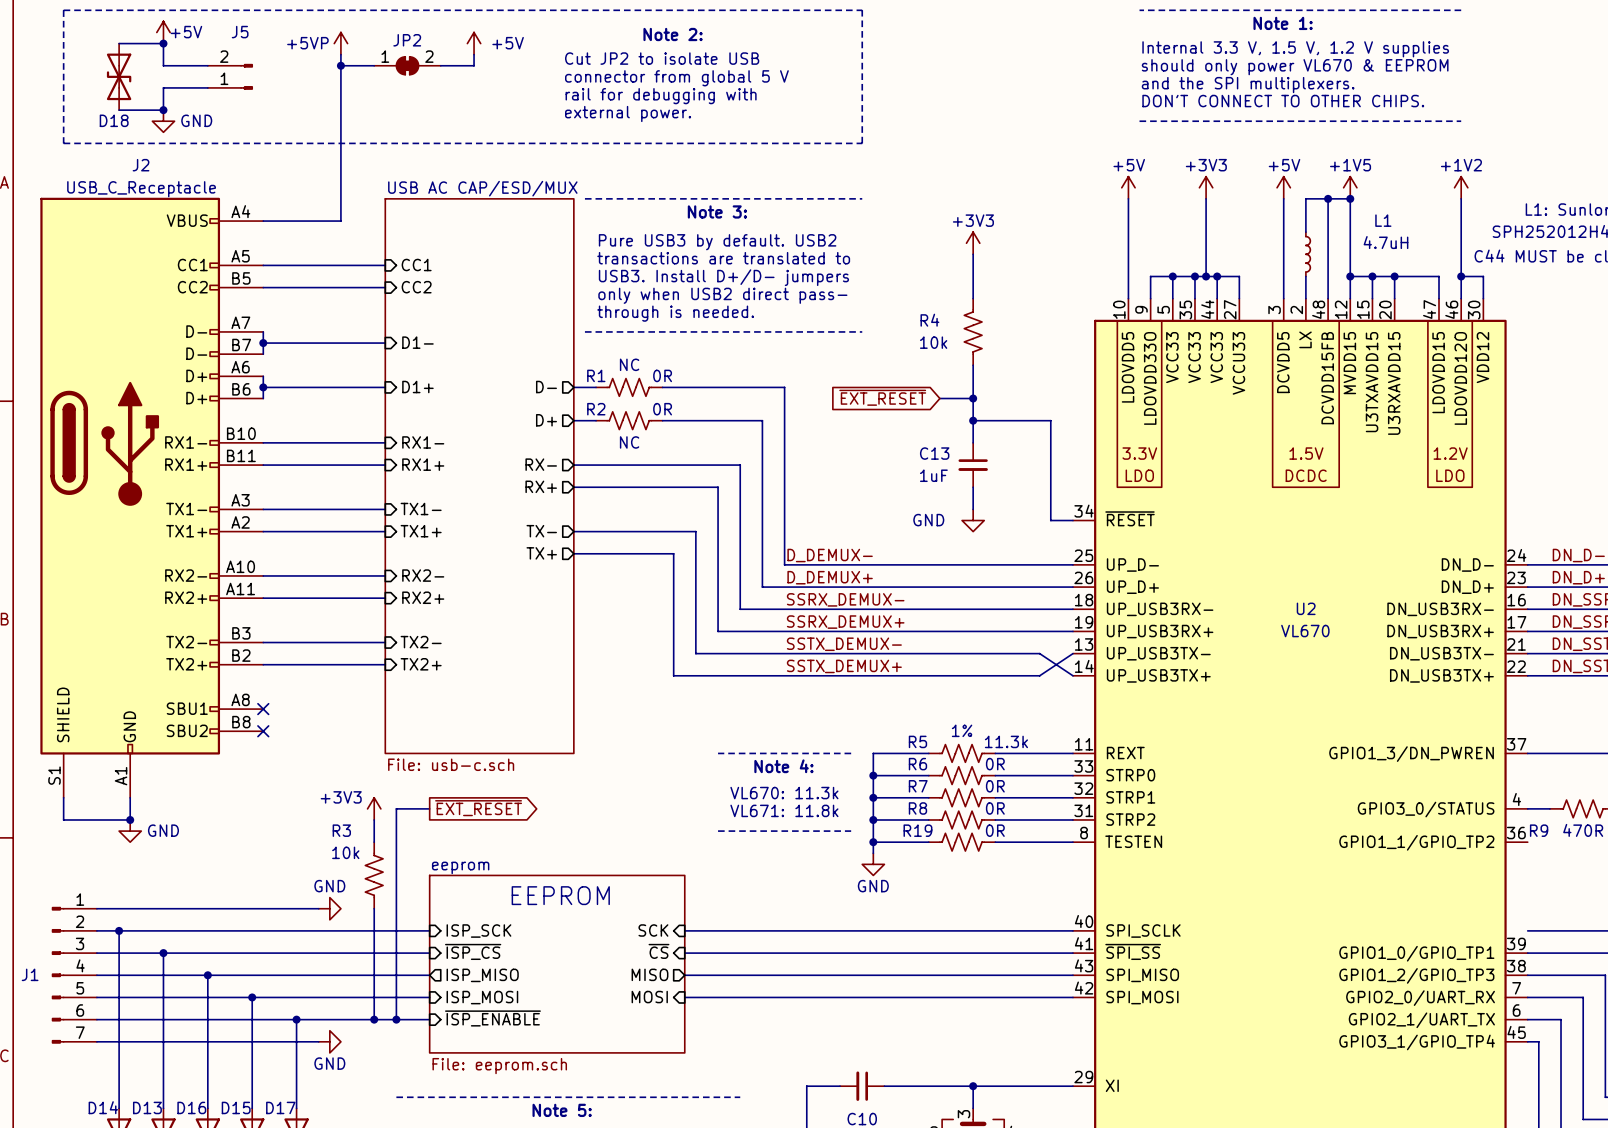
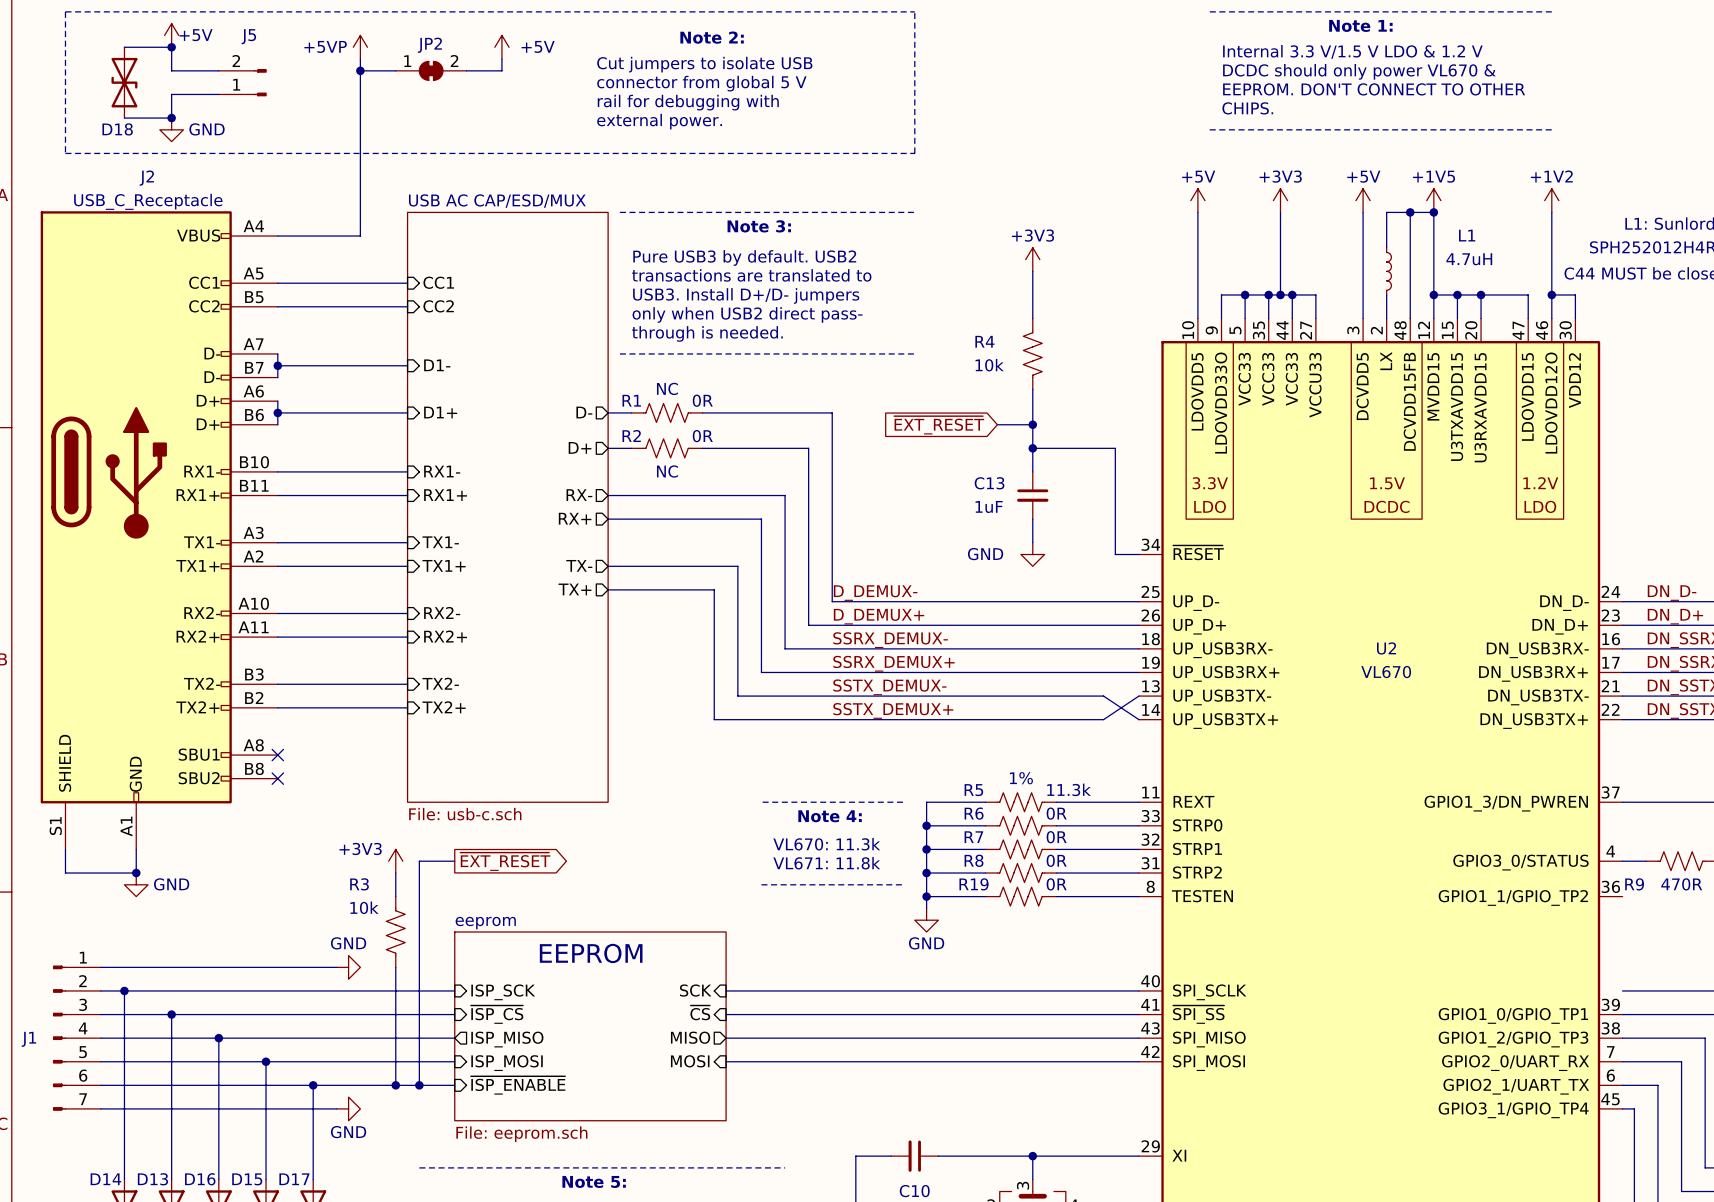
text: Internal 3.3 V, 1.5 V, 1.2 V supplies (1295, 49) -> Internal 3.3 V/1.5 V LDO & 1.2 V (1352, 51)
text: Cut JP2 to isolate USB (662, 58) -> Cut jumpers to isolate USB (704, 64)
text: should only power VL670 & EEPROM (1295, 67) -> DCDC should only power VL670 & (1359, 71)
text: and the SPI multiplexers. (1248, 85) -> none
text: none -> CHIPS. (1247, 108)
text: DON'T CONNECT TO OTHER CHIPS. (1283, 101) -> EEPROM. DON'T CONNECT TO OTHER (1374, 89)

